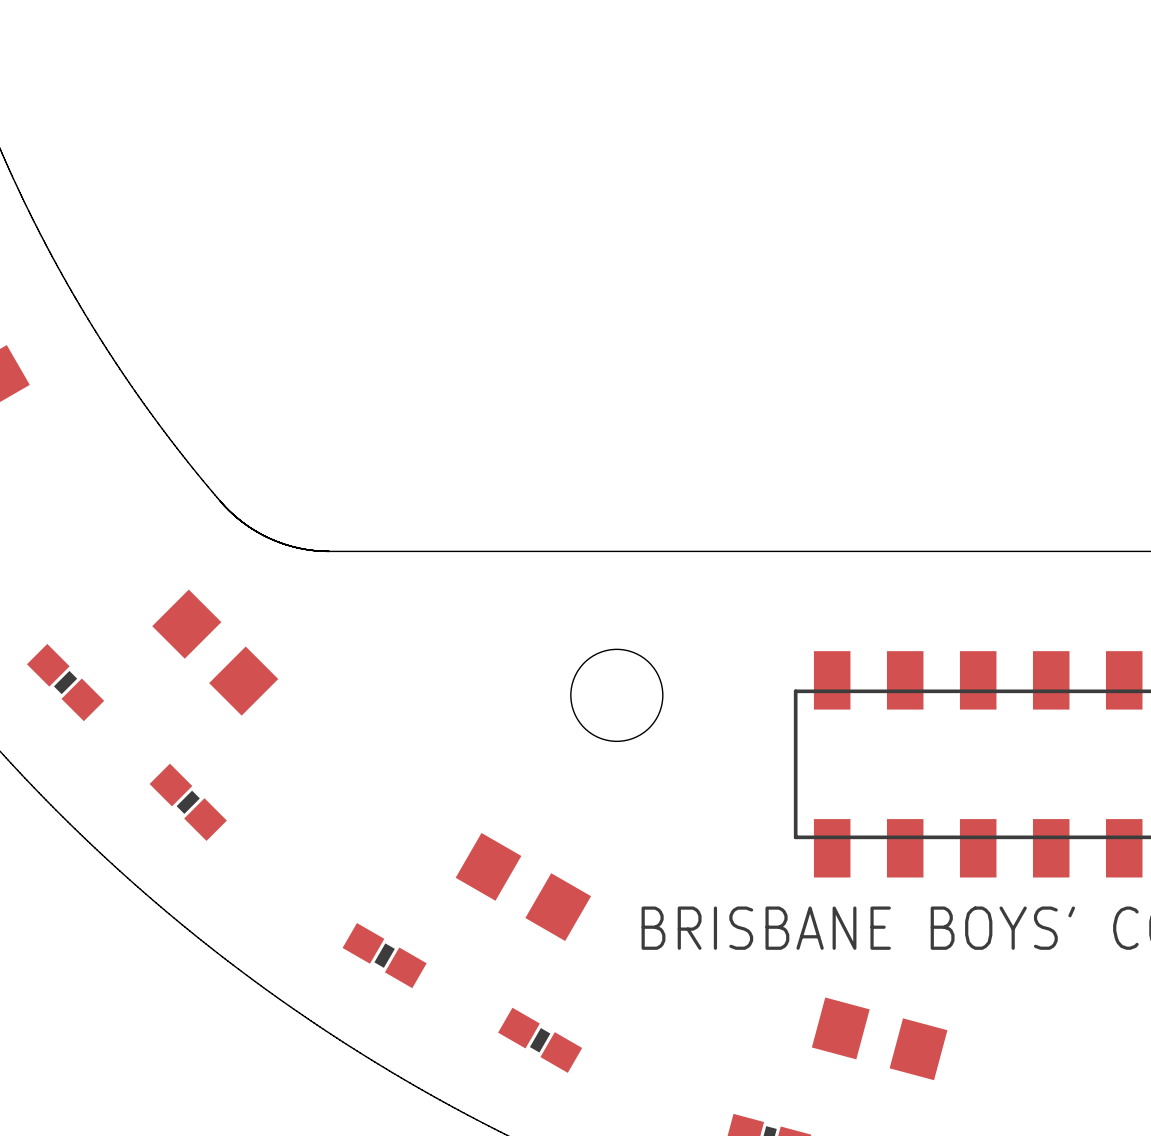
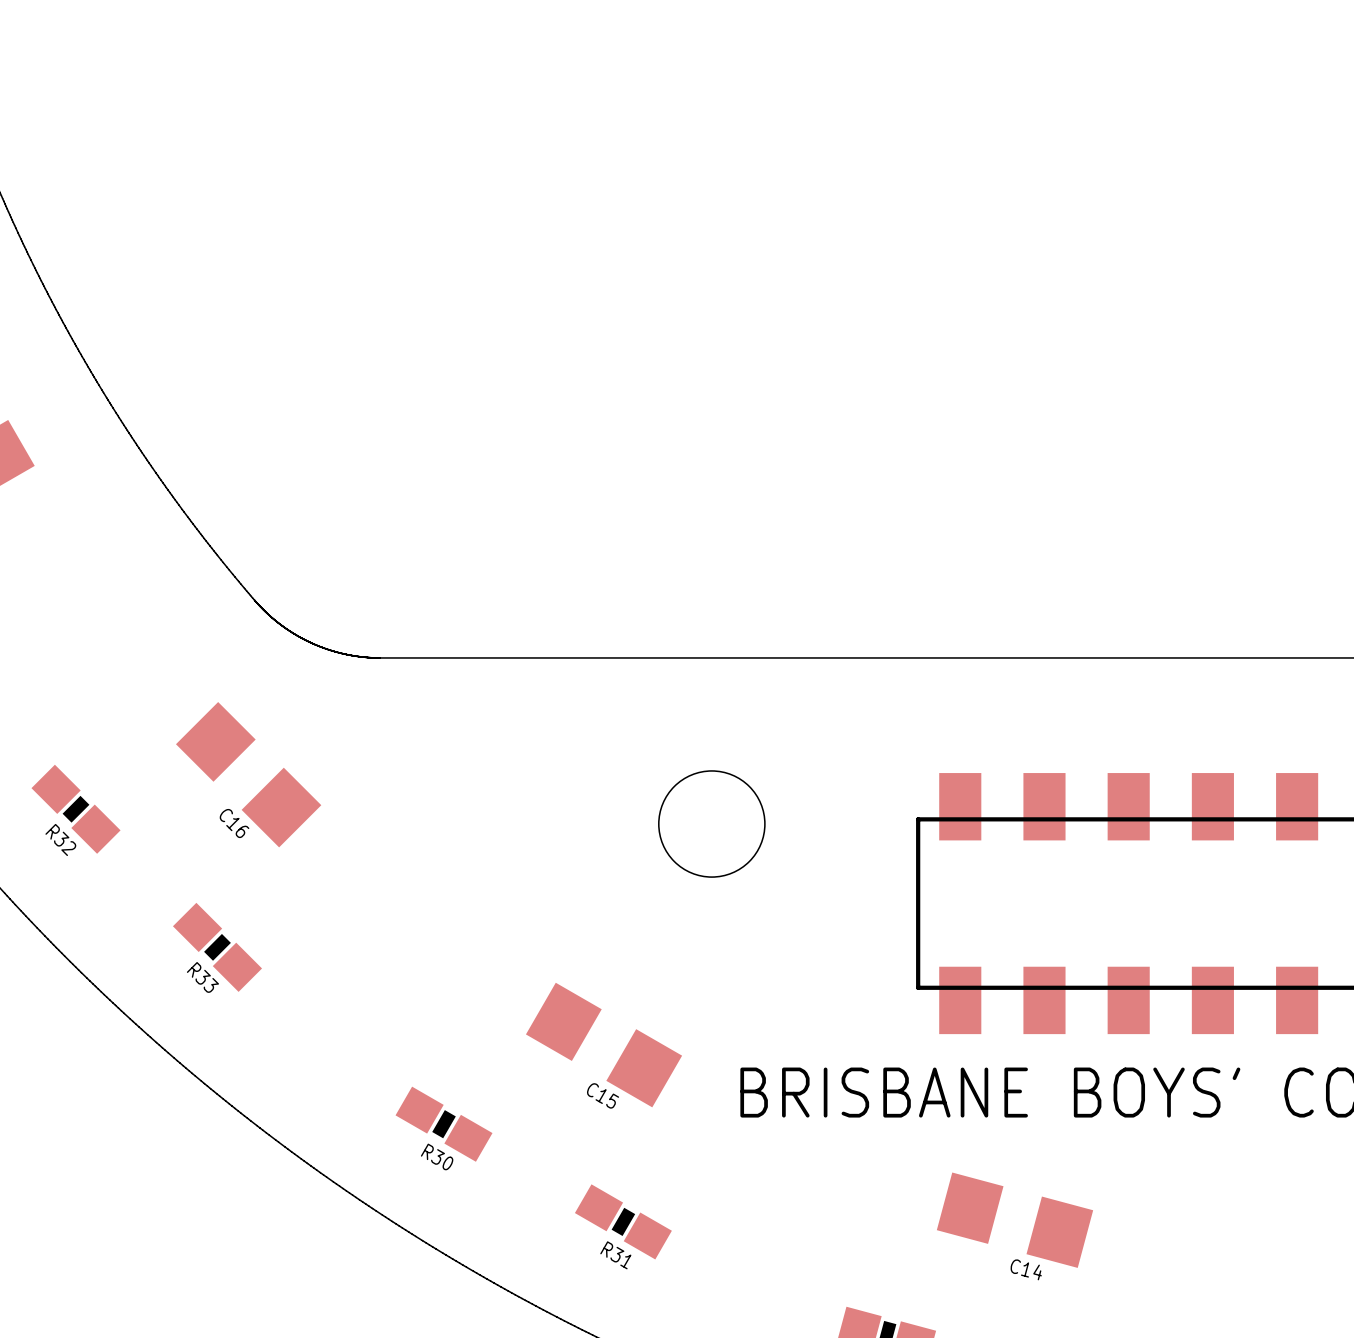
C16 name: none -> C16 (234, 823)
R32 name: none -> R32 (60, 839)
R33 name: none -> R33 (202, 977)
C15 name: none -> C15 (603, 1095)
R30 name: none -> R30 (437, 1156)
R31 name: none -> R31 (615, 1255)
C14 name: none -> C14 (1026, 1269)

